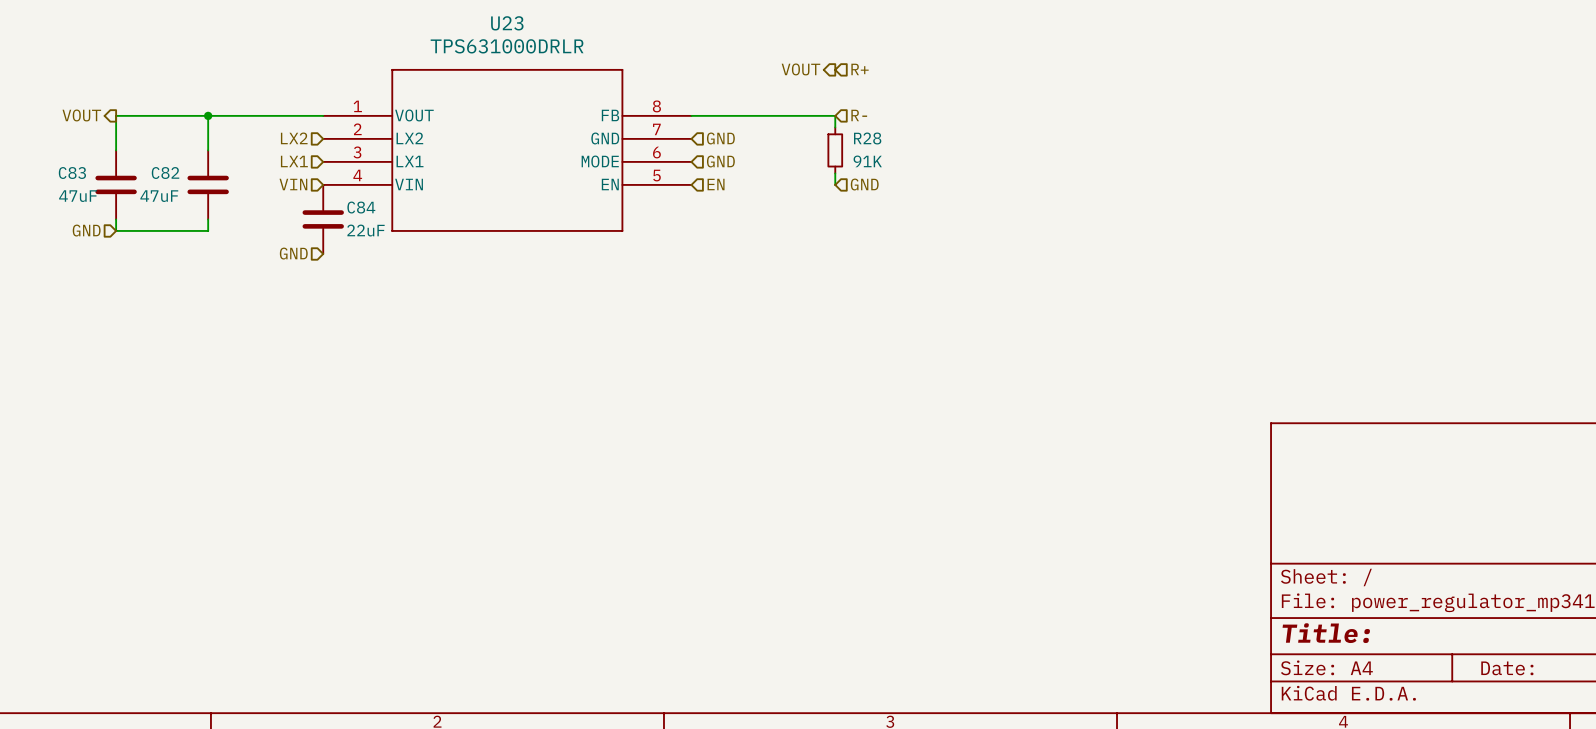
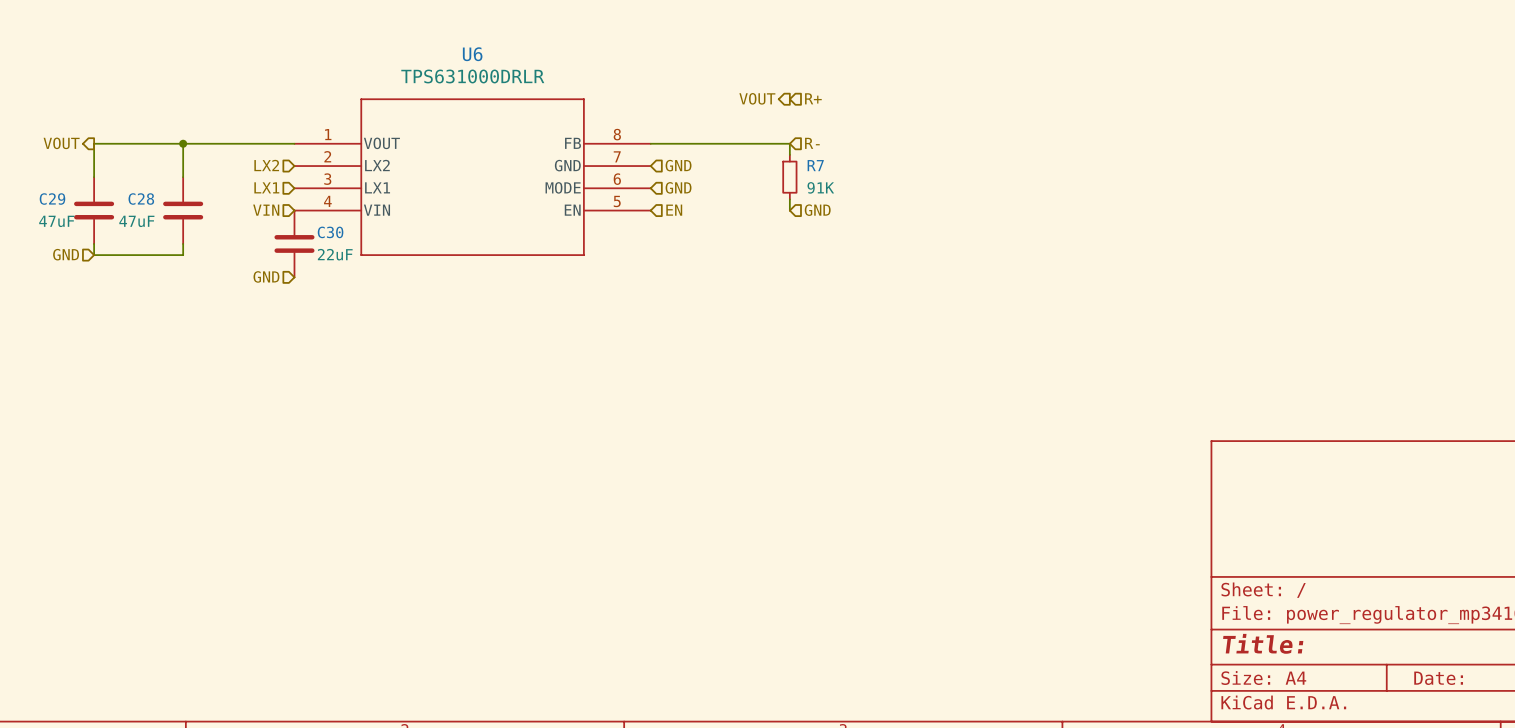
U23 name: U23 (507, 23) -> U6 (472, 54)
R28 name: R28 (867, 138) -> R7 (815, 165)
C83 name: C83 (72, 173) -> C29 (52, 199)
C82 name: C82 (165, 173) -> C28 (141, 199)
C84 name: C84 (361, 207) -> C30 (330, 232)

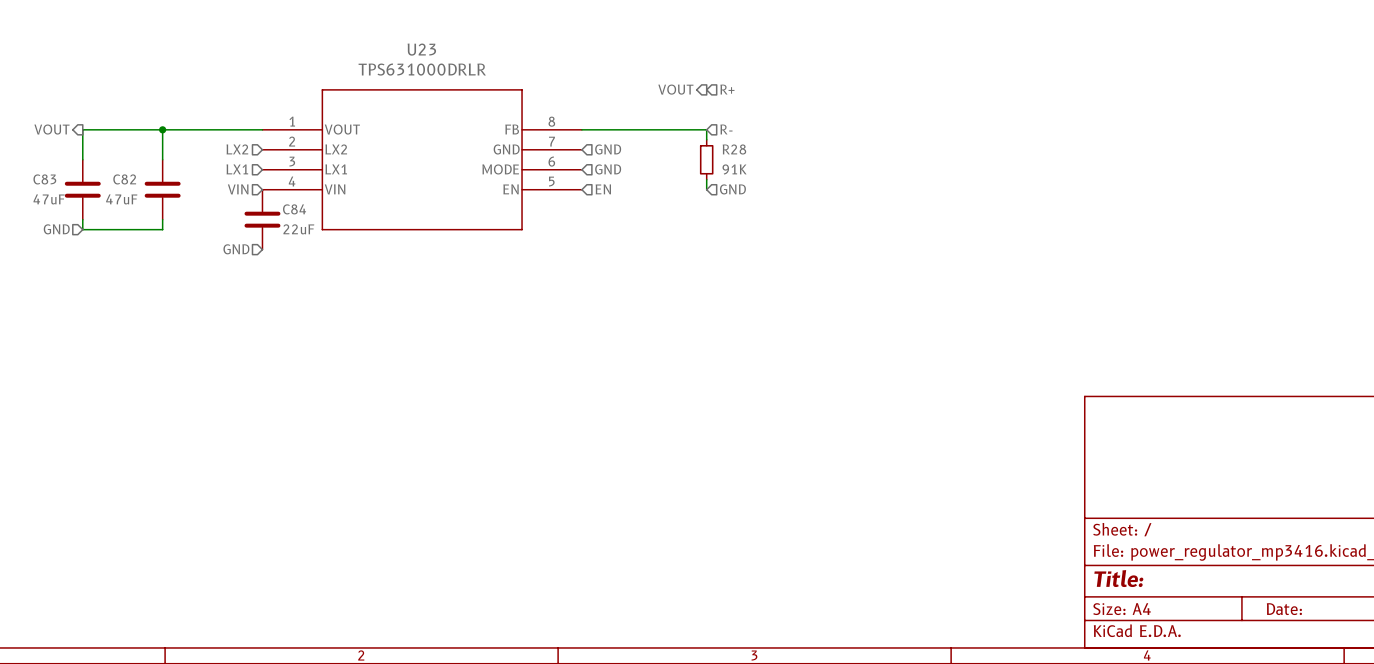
U6 name: U6 (472, 54) -> U23 (421, 49)
R7 name: R7 (815, 165) -> R28 (734, 149)
C29 name: C29 (52, 199) -> C83 (44, 179)
C28 name: C28 (141, 199) -> C82 (124, 179)
C30 name: C30 (330, 232) -> C84 (294, 209)

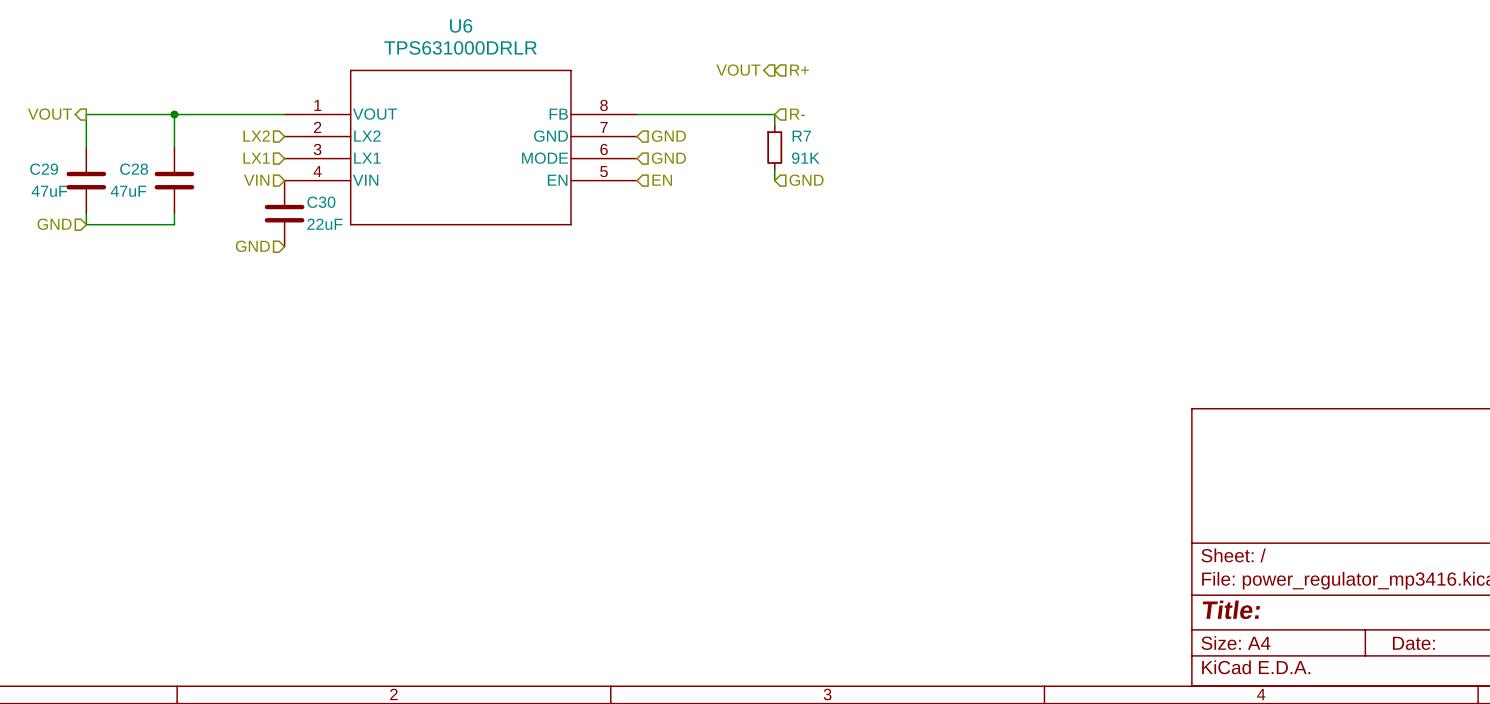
U23 name: U23 (421, 49) -> U6 (461, 25)
R28 name: R28 (734, 149) -> R7 (801, 136)
C83 name: C83 (44, 179) -> C29 (44, 169)
C82 name: C82 (124, 179) -> C28 (134, 169)
C84 name: C84 (294, 209) -> C30 (321, 202)

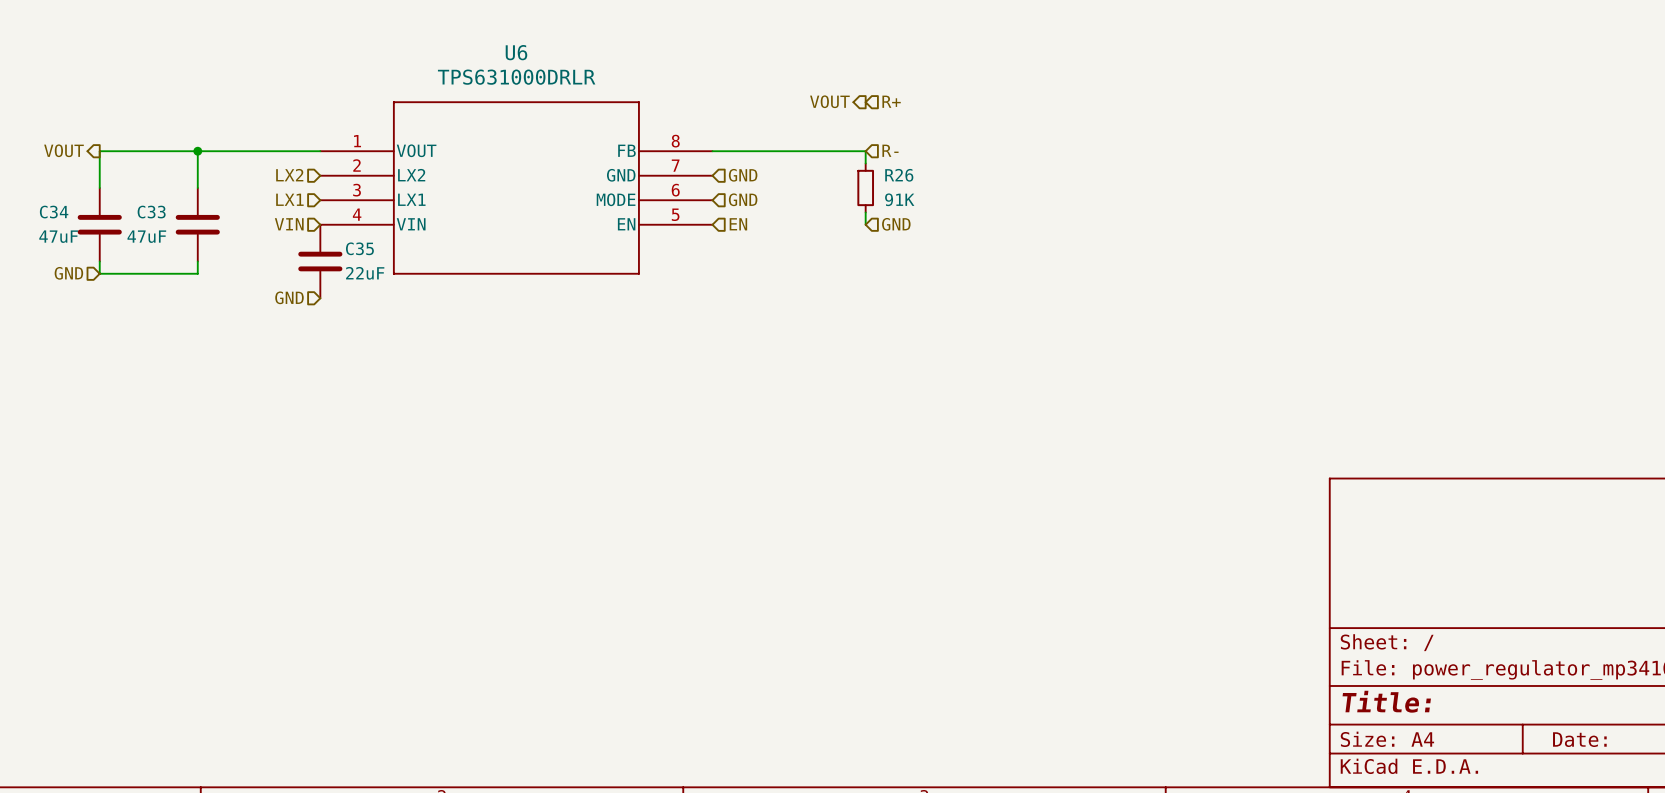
R7 name: R7 (801, 136) -> R26 (899, 175)
C29 name: C29 (44, 169) -> C34 (54, 212)
C28 name: C28 (134, 169) -> C33 (151, 212)
C30 name: C30 (321, 202) -> C35 (359, 248)

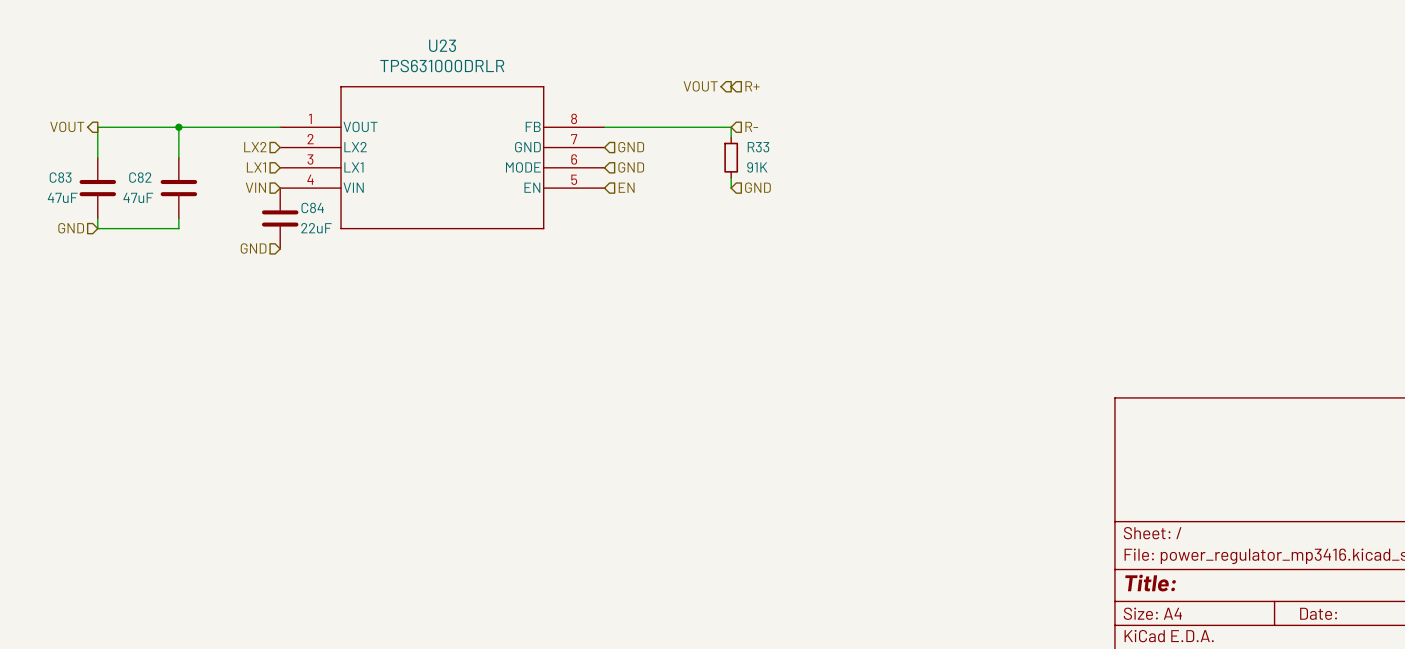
U6 name: U6 (516, 52) -> U23 (442, 45)
R26 name: R26 (899, 175) -> R33 (758, 147)
C34 name: C34 (54, 212) -> C83 (60, 177)
C33 name: C33 (151, 212) -> C82 (140, 177)
C35 name: C35 (359, 248) -> C84 (312, 207)

